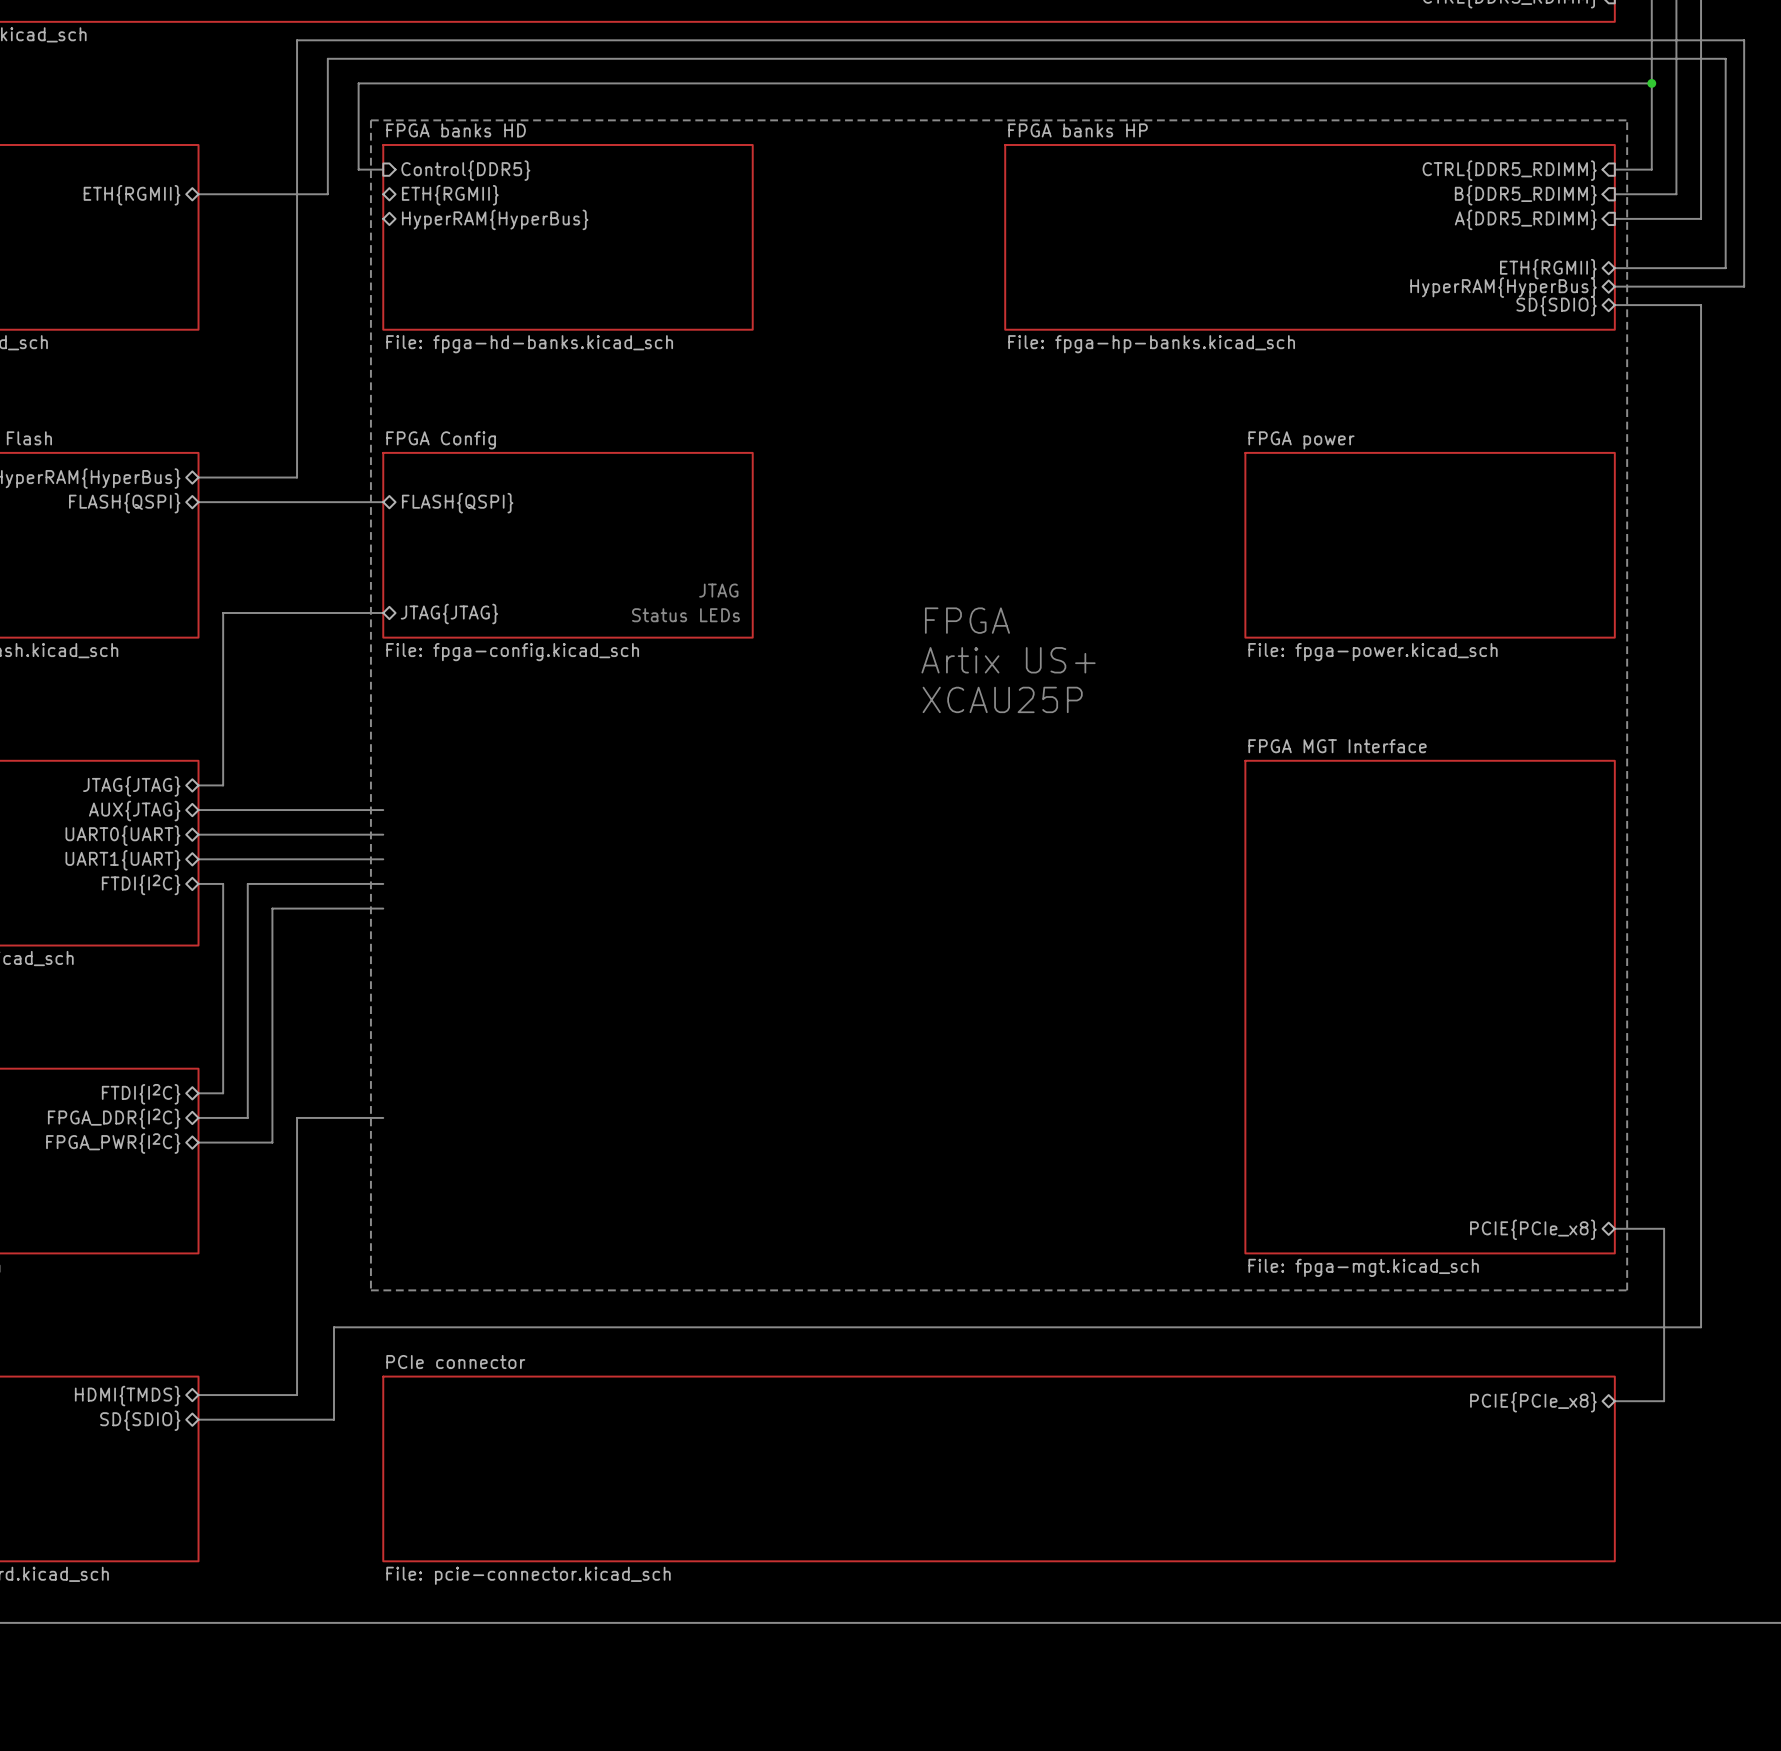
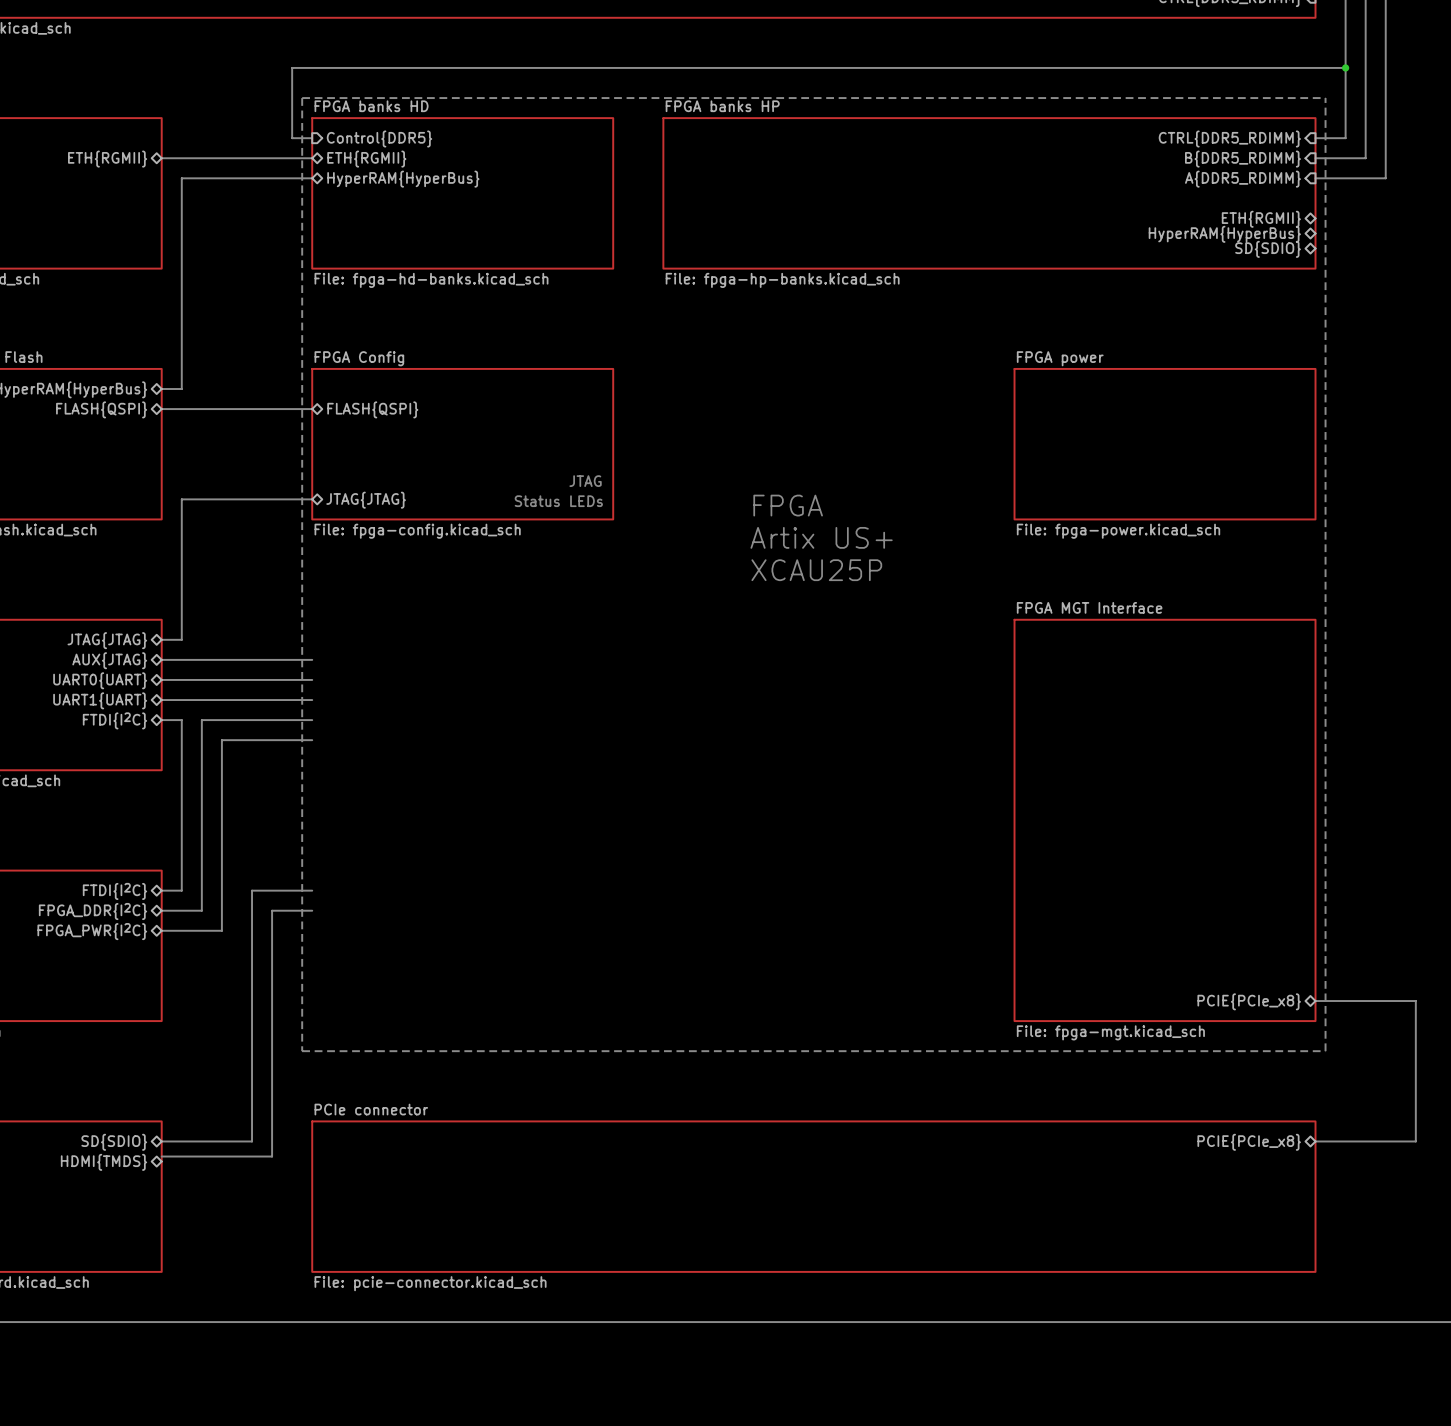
bus: (327, 194) (327, 58) (1725, 58) (1725, 268) (1614, 268) -> (267, 158) (312, 158)
sheet FPGA banks HP: none -> File: fpga-hp-banks.kicad_sch (989, 193)
sheet FPGA banks HP: File: fpga-hp-banks.kicad_sch (1310, 237) -> none
bus: (1614, 286) (1744, 286) (1744, 40) (297, 40) (297, 477) (223, 477) -> (312, 178) (181, 178) (181, 389)
bus: (1614, 305) (1701, 305) (1701, 1327) (333, 1327) -> none
bus: none -> (312, 890) (252, 890) (252, 1141) (161, 1141)
bus: (333, 1117) (297, 1117) (297, 1395) (198, 1395) -> (272, 910) (272, 1081)
bus: (1664, 1228) (1664, 1401) -> (1355, 1001) (1415, 1001) (1415, 1141) (1355, 1141)
sheet pin: HDMI{TMDS} (127, 1396) -> SD{SDIO} (114, 1142)
sheet pin: SD{SDIO} (140, 1420) -> HDMI{TMDS} (103, 1162)

